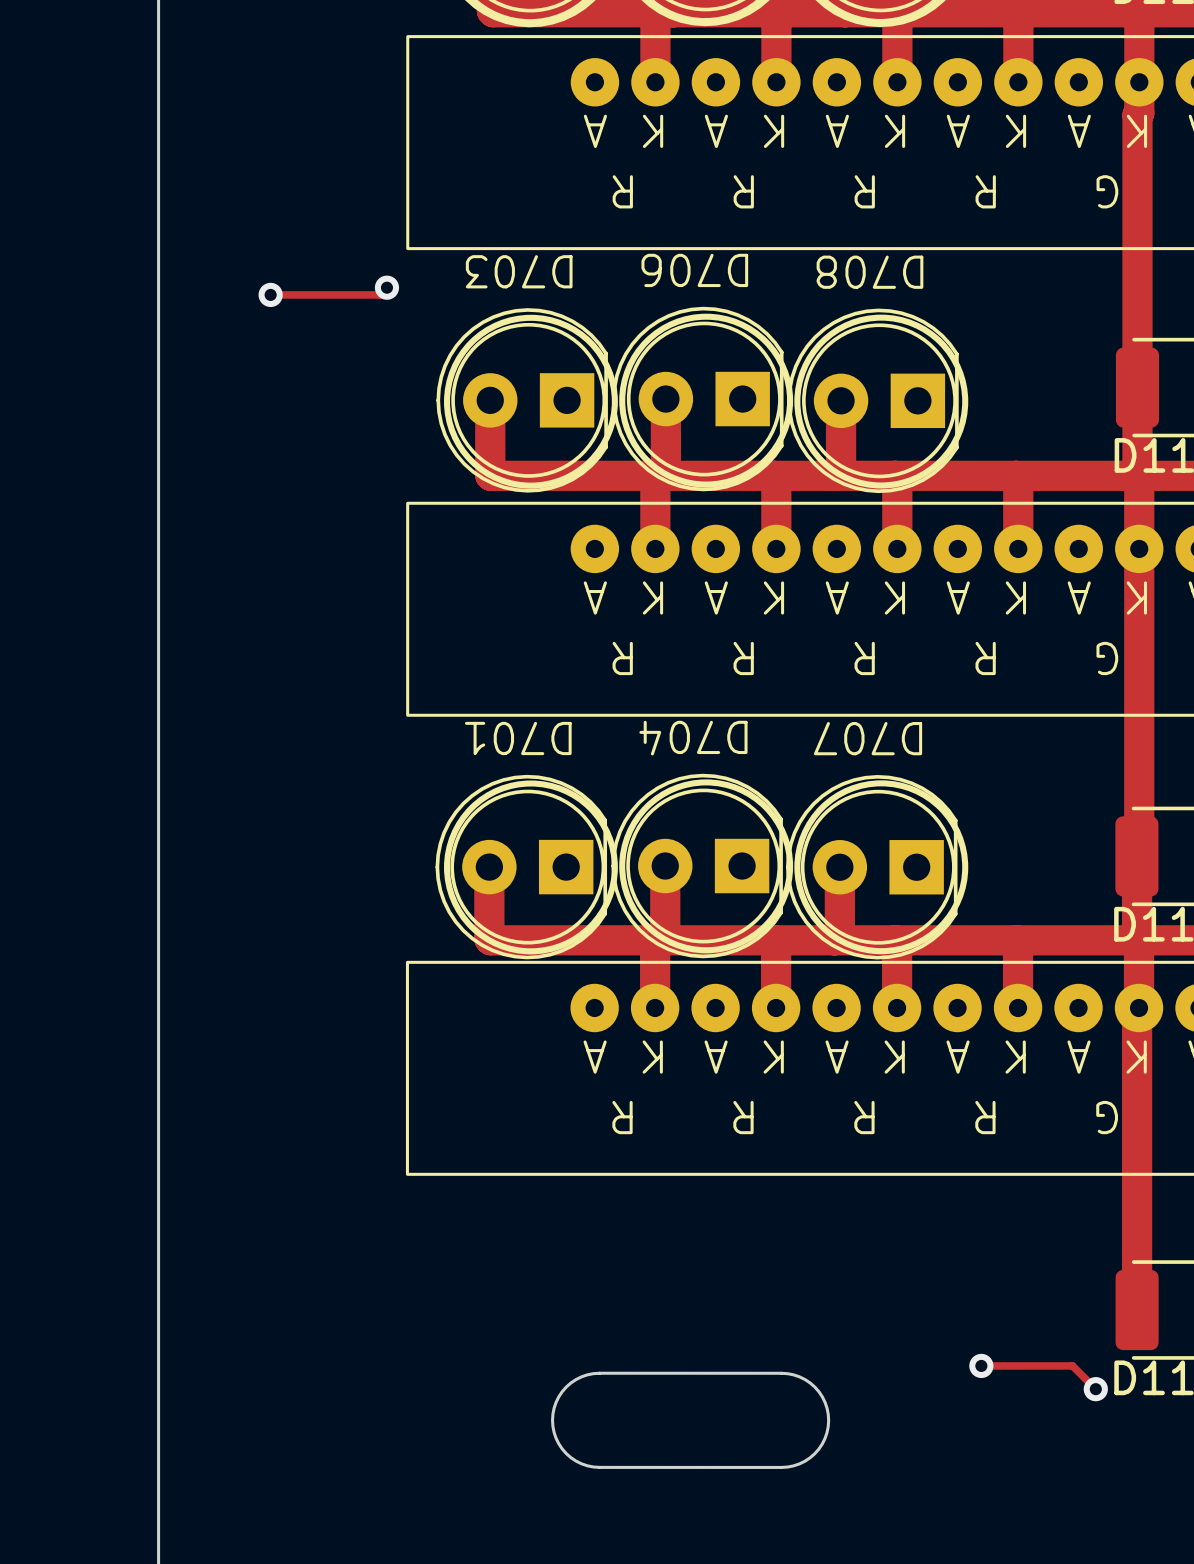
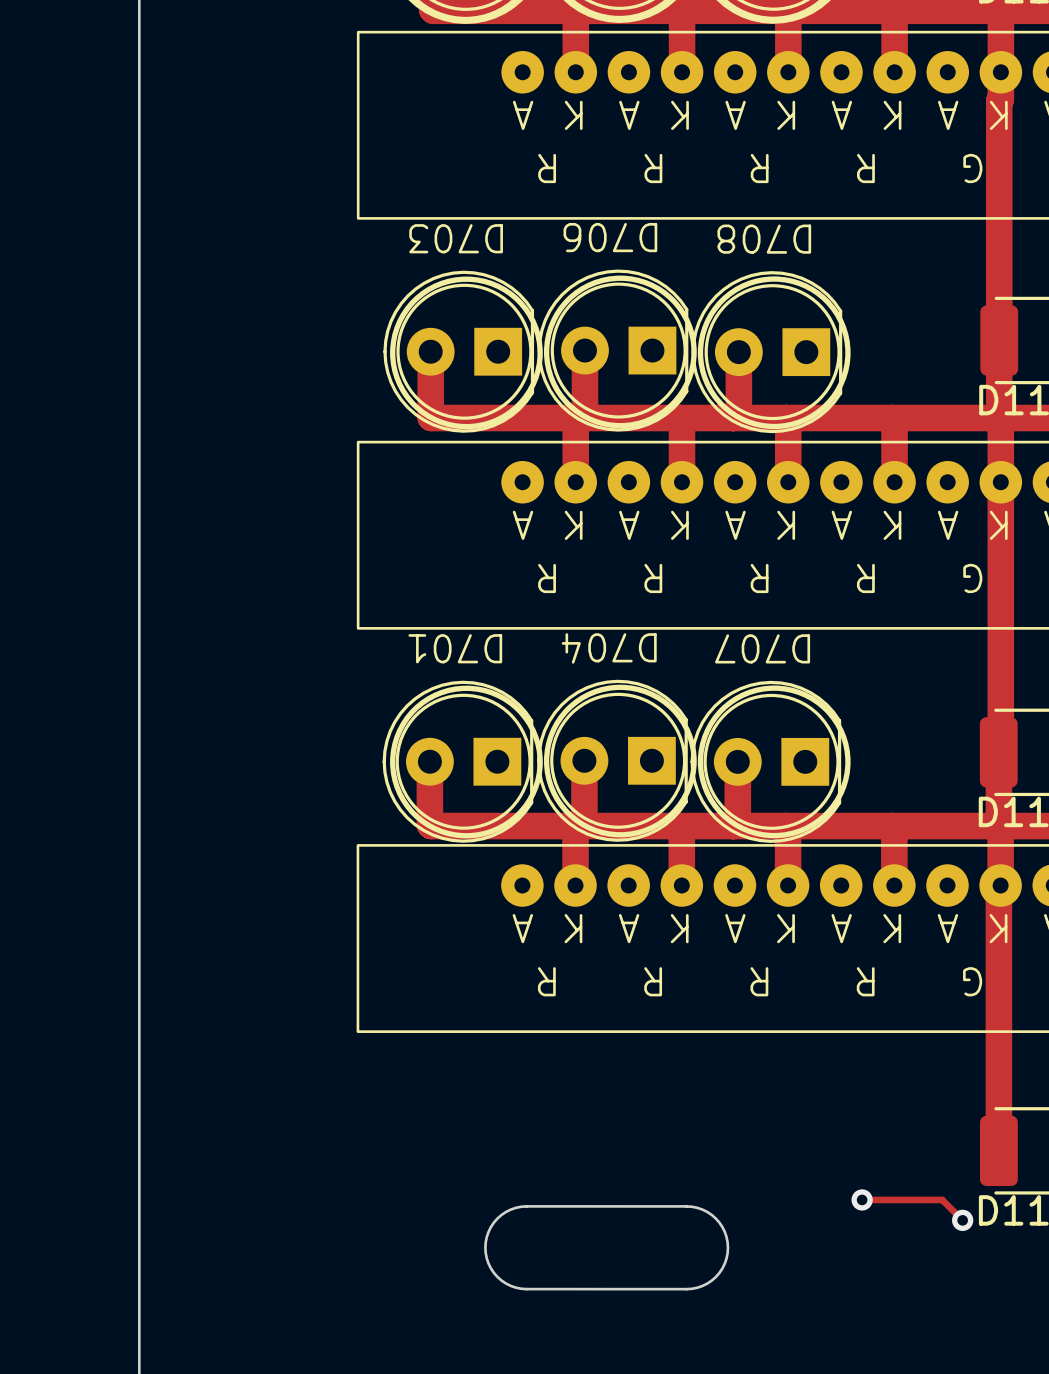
track: (386, 287) (379, 294) (270, 294) -> none
via: (386, 287) -> none
via: (270, 294) -> none

